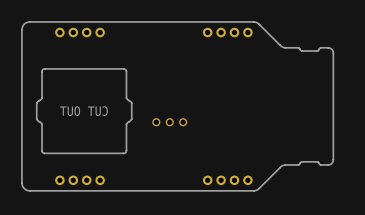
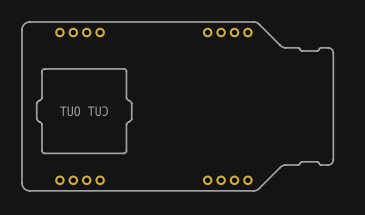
part: (169, 122) -> none

